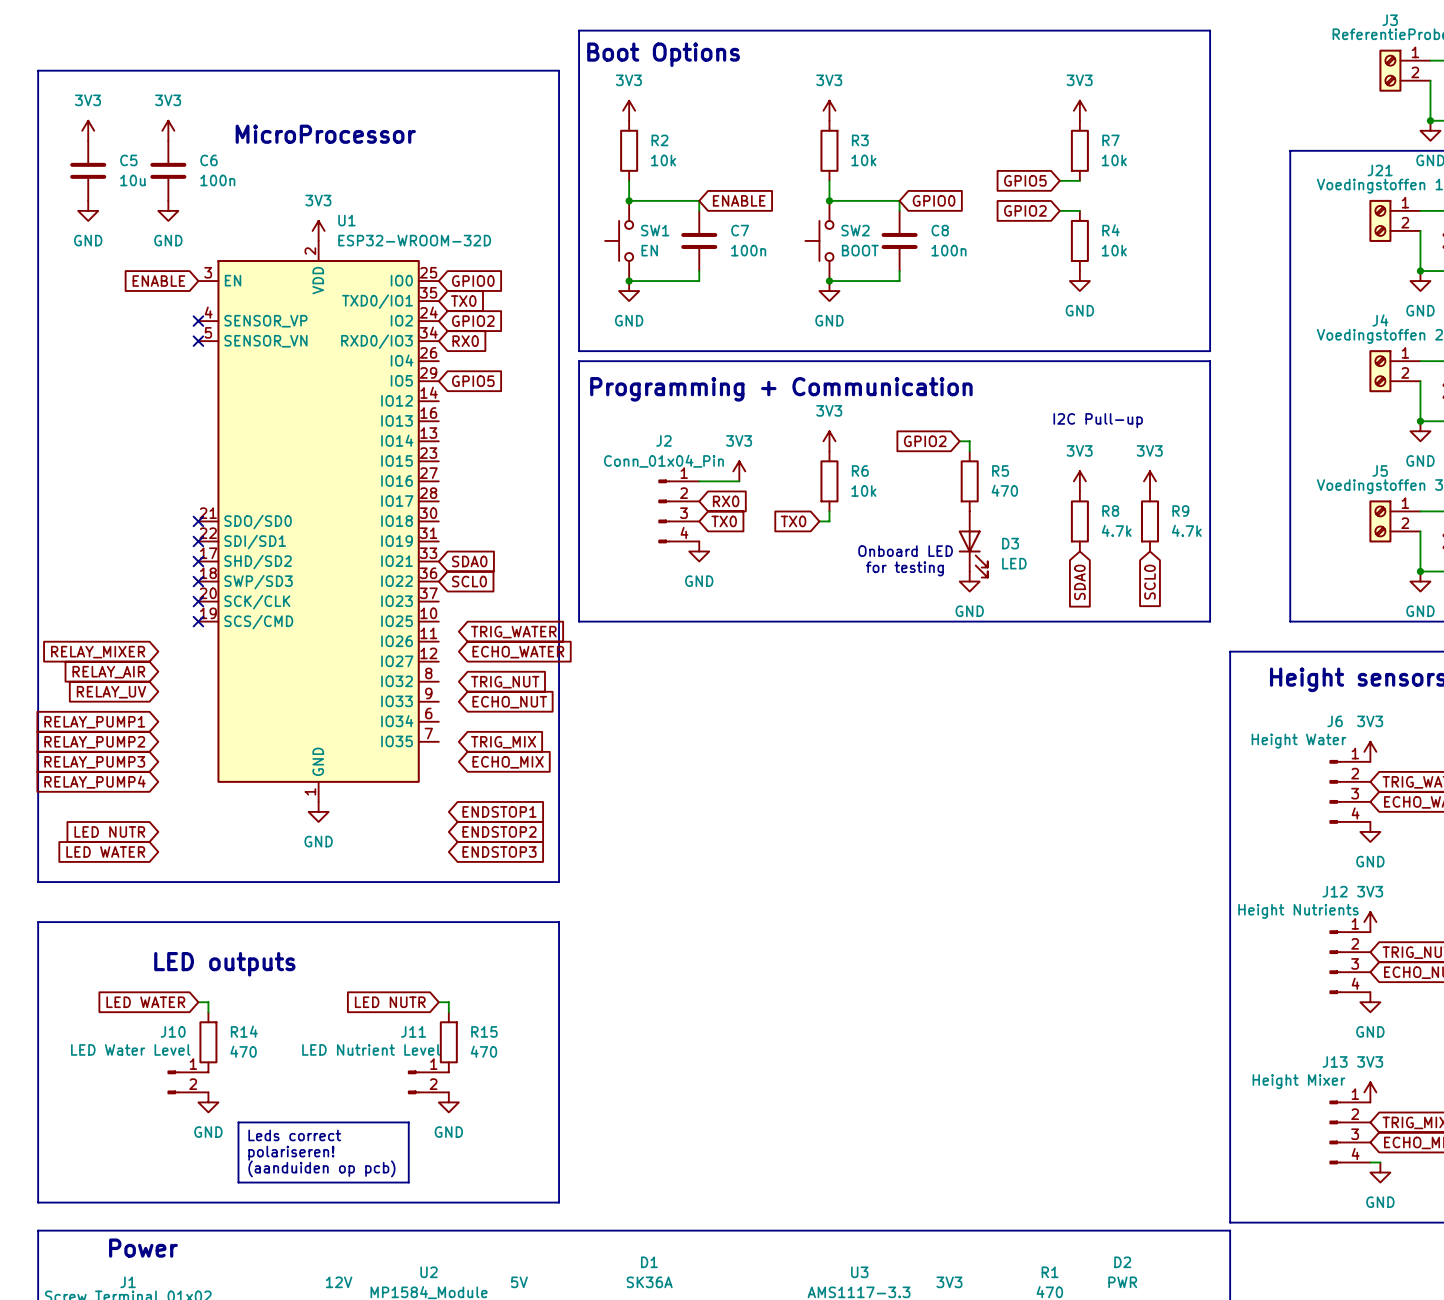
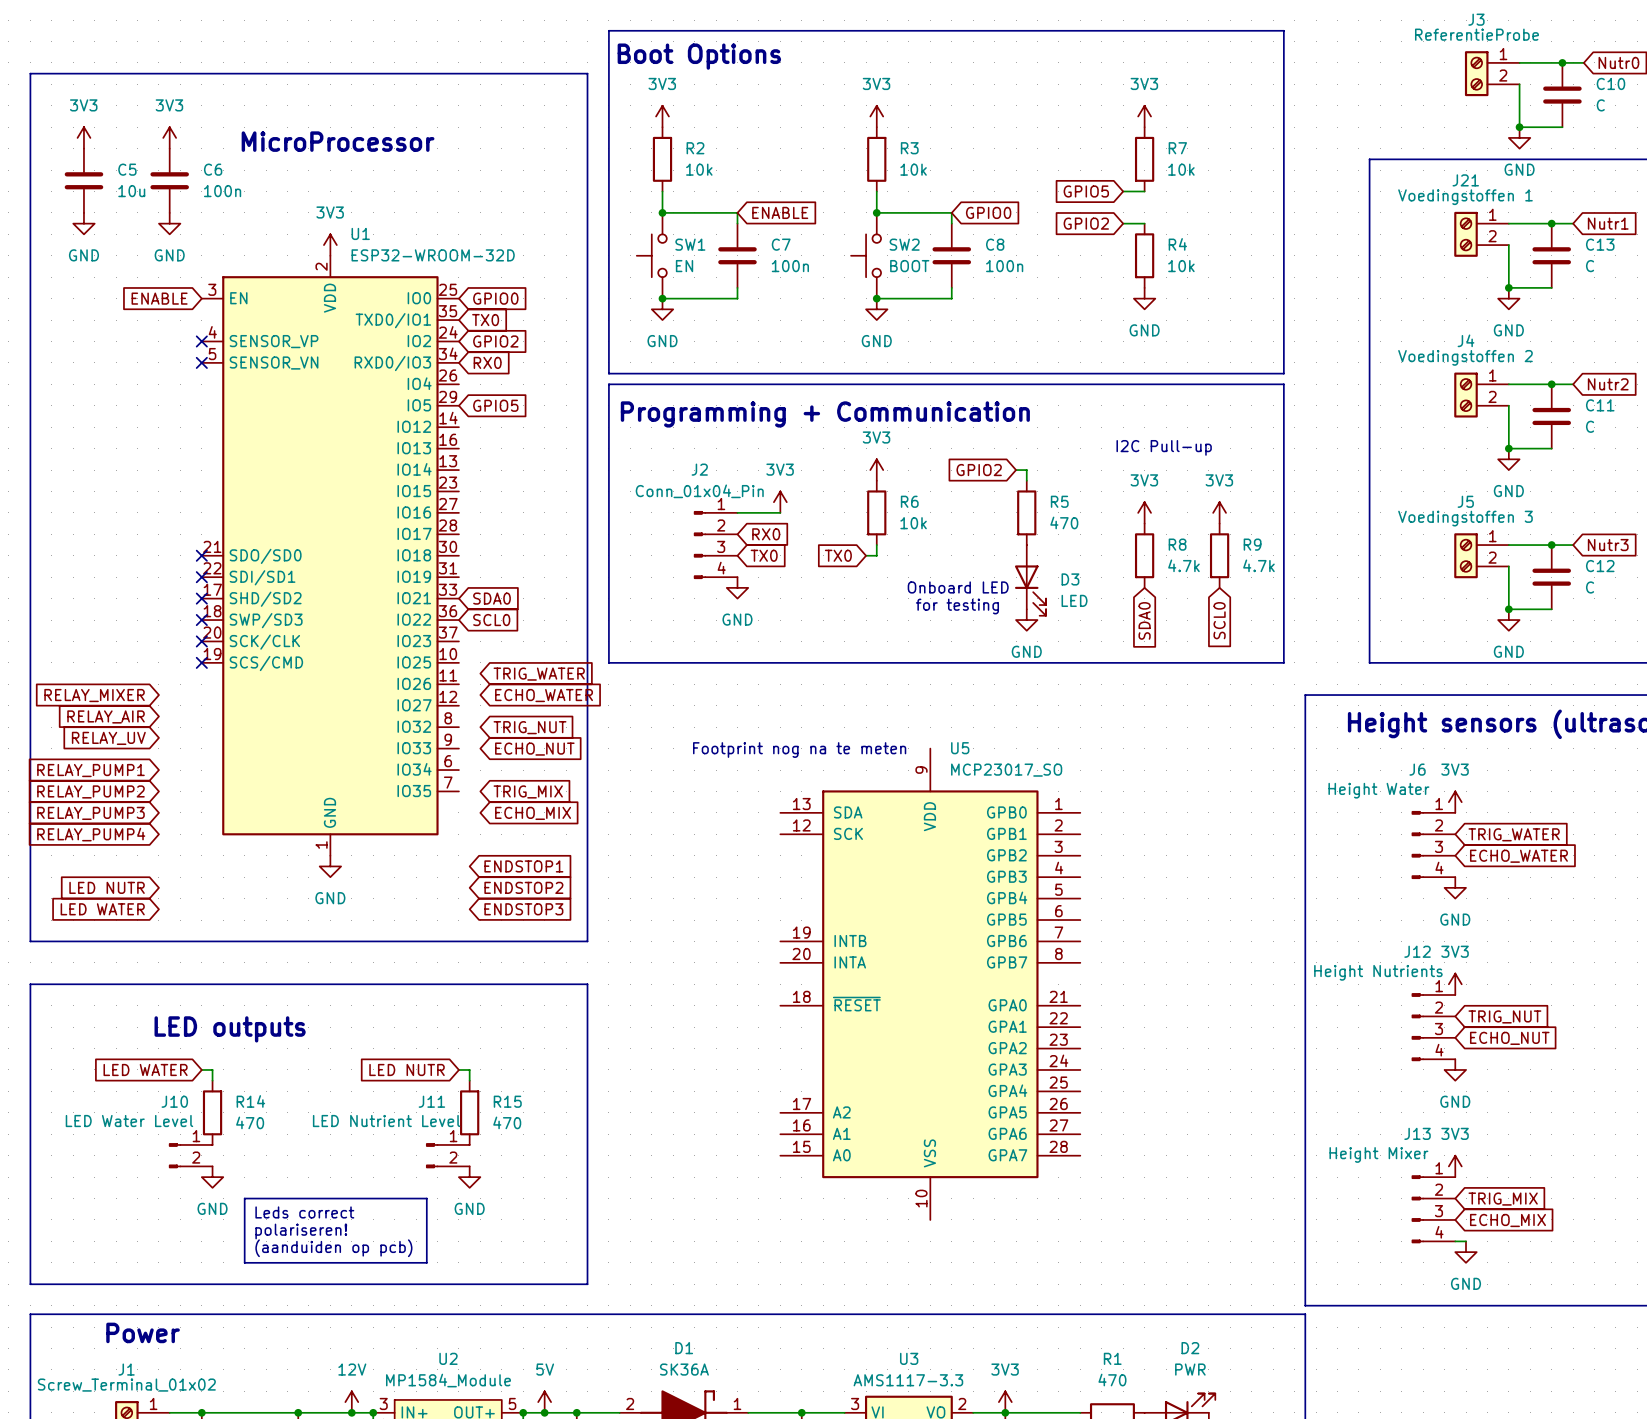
text: none -> Footprint nog na te meten (799, 750)
U5: none -> MCP23017_SO (930, 984)

